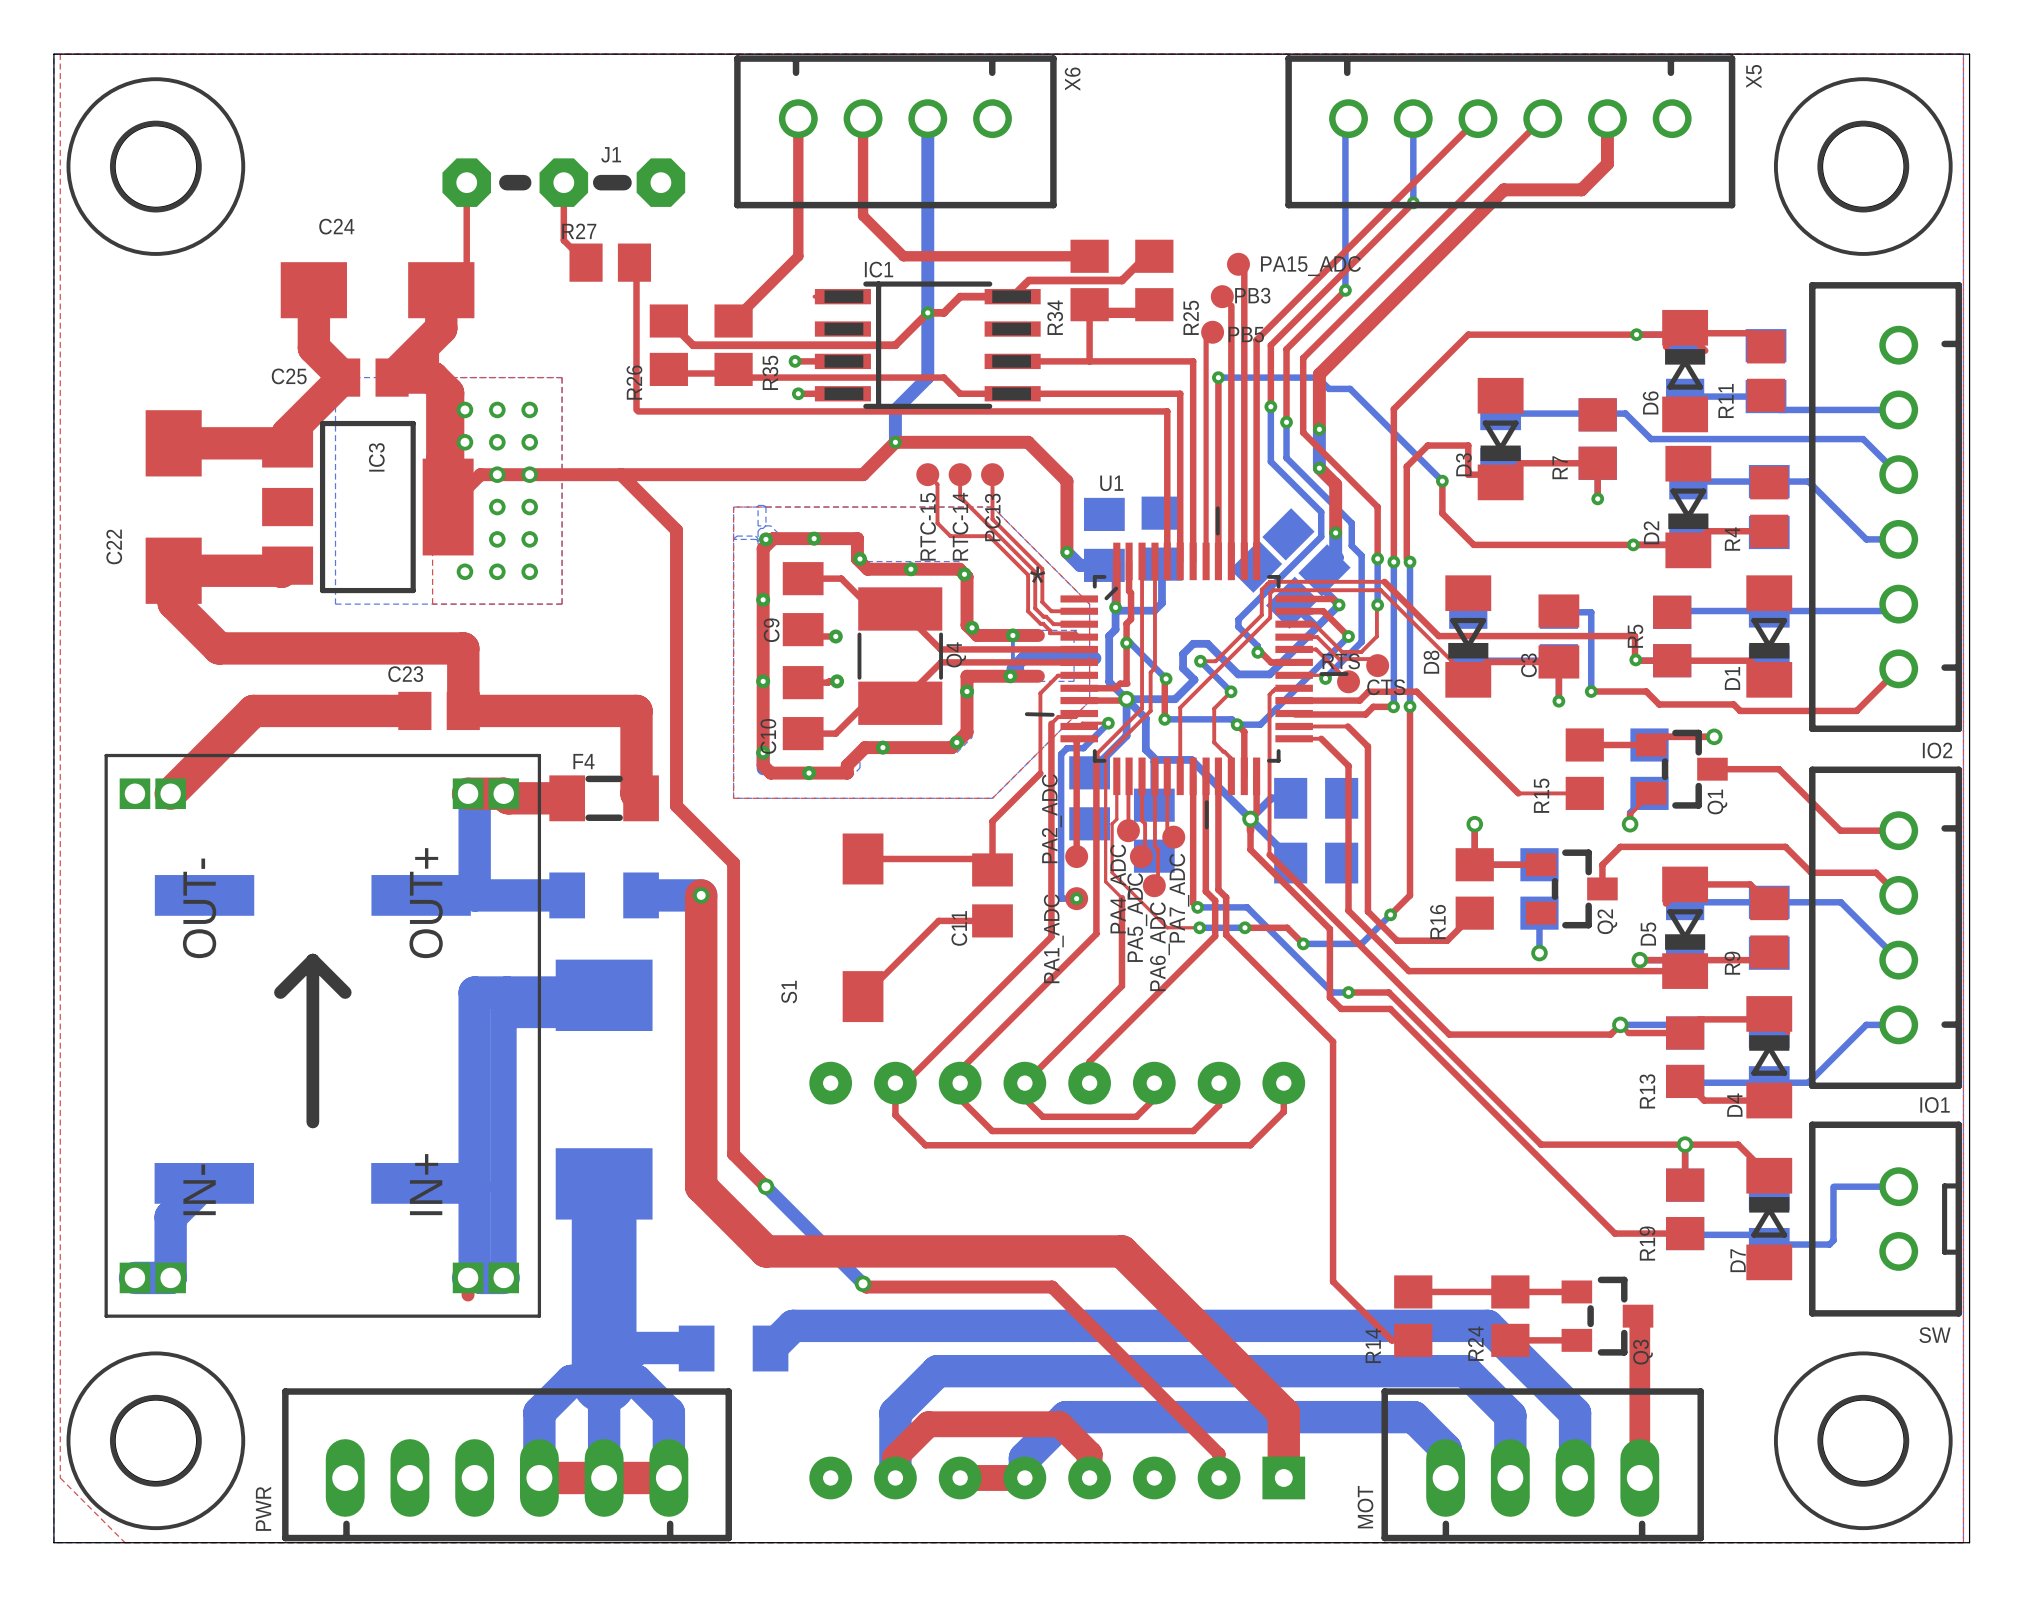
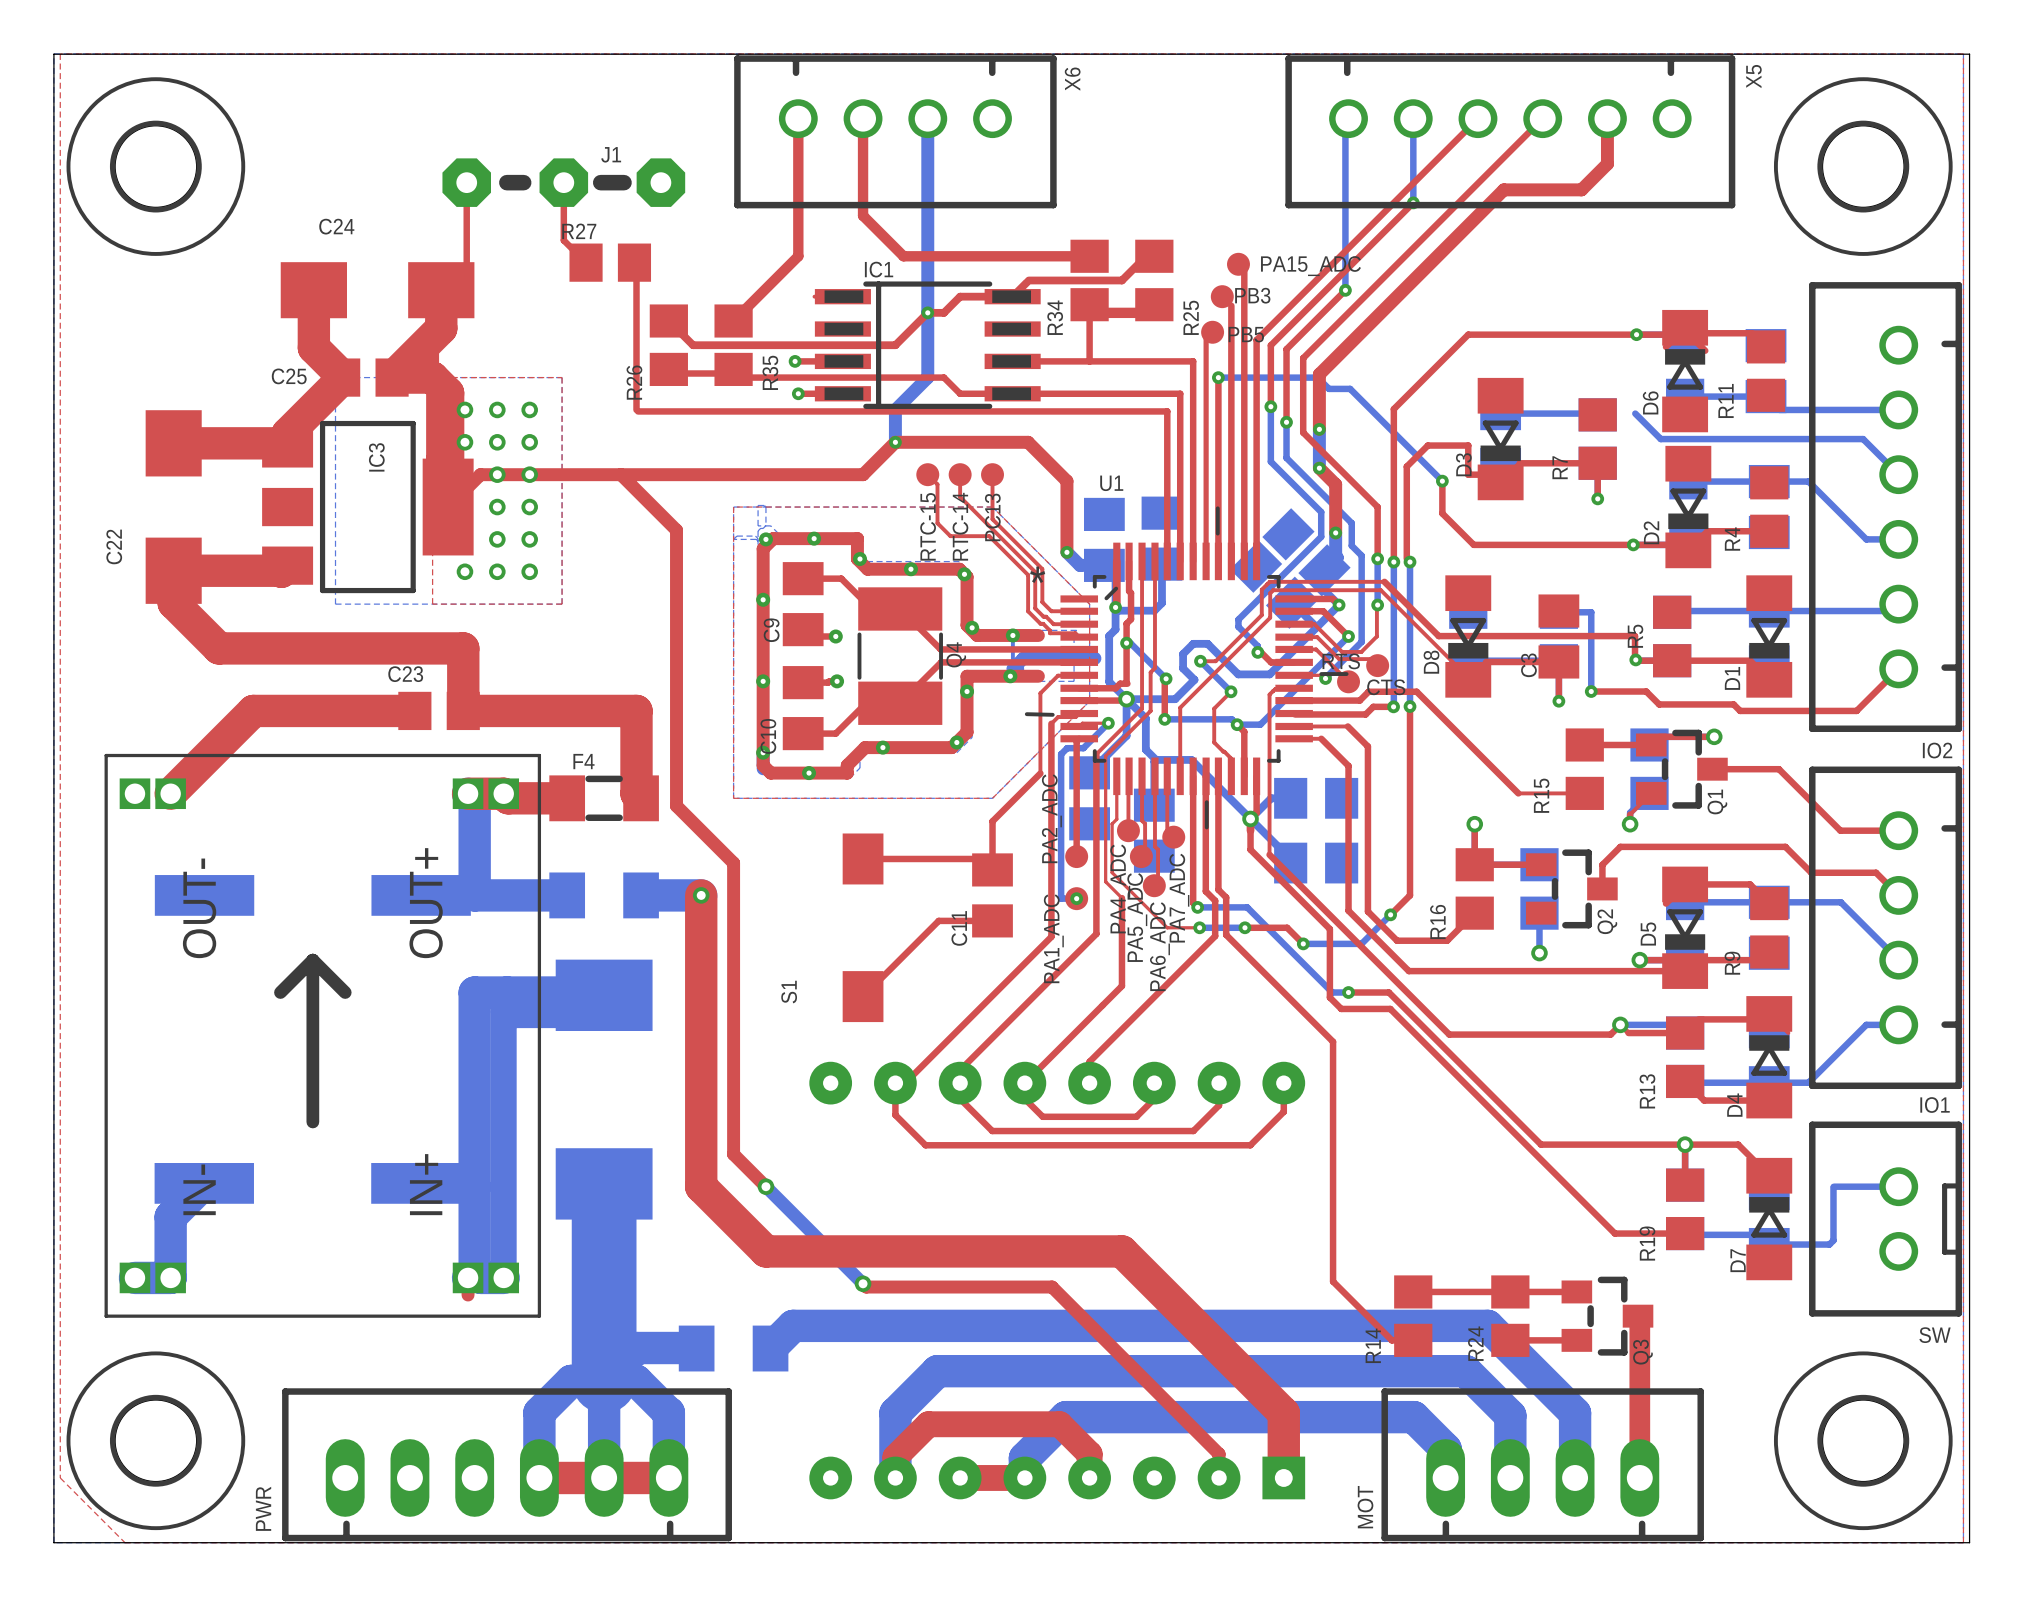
bottom track: (1597, 414) (1625, 413) (1651, 439) (1660, 439) -> (1635, 413) (1660, 439)

